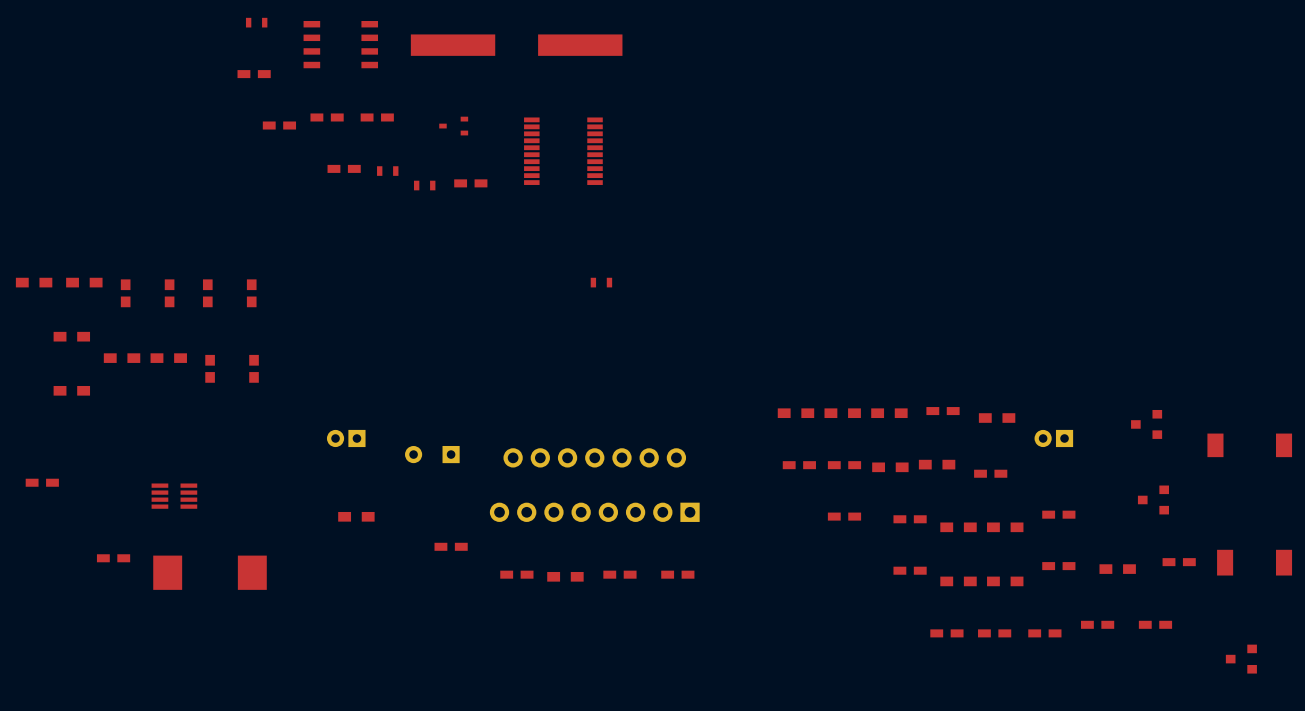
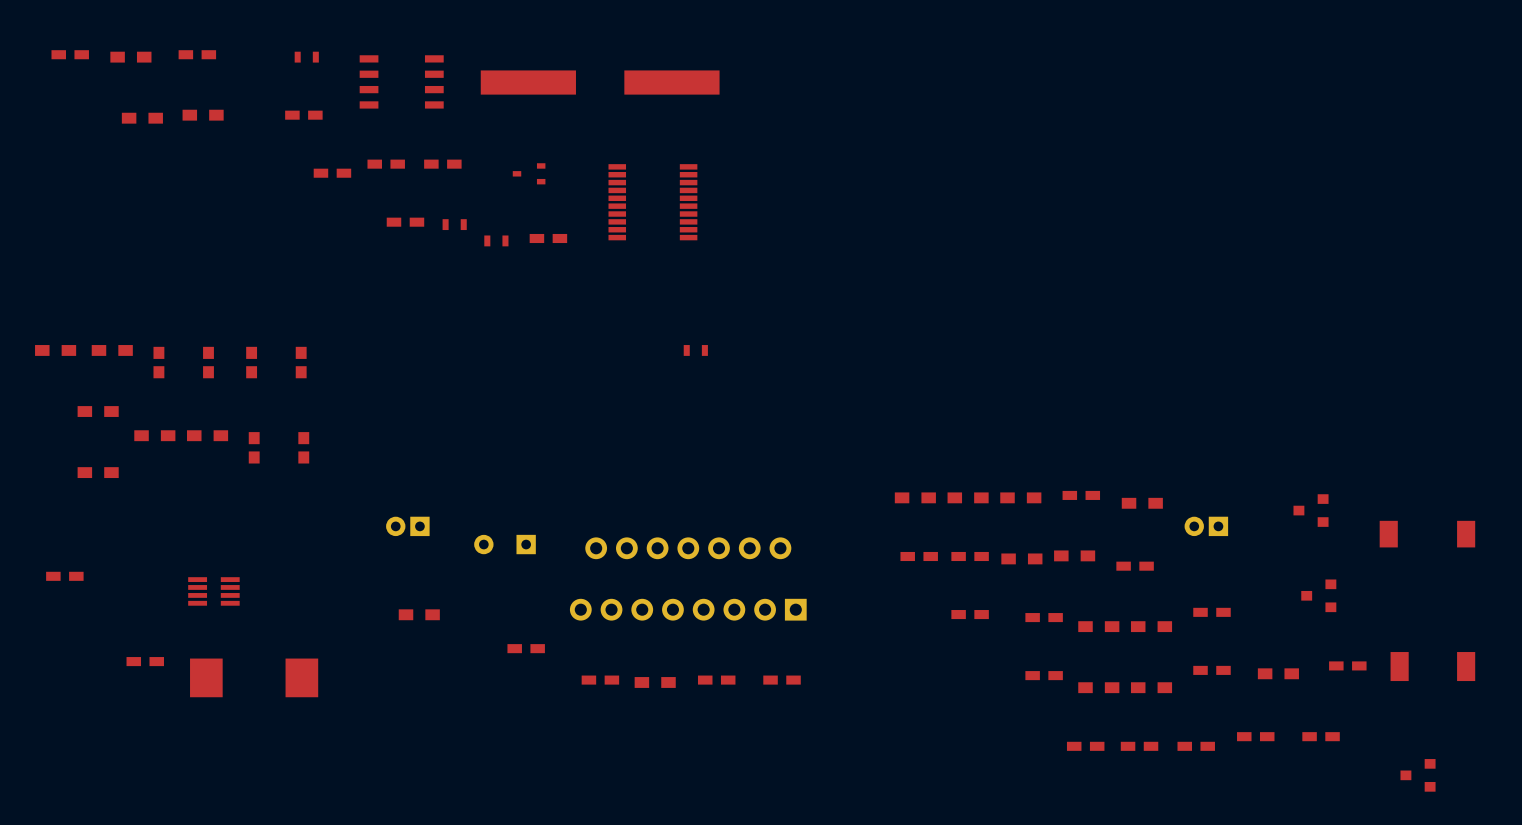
part: none -> (70, 54)
part: none -> (197, 54)
part: none -> (130, 57)
part: none -> (203, 115)
part: none -> (142, 118)

